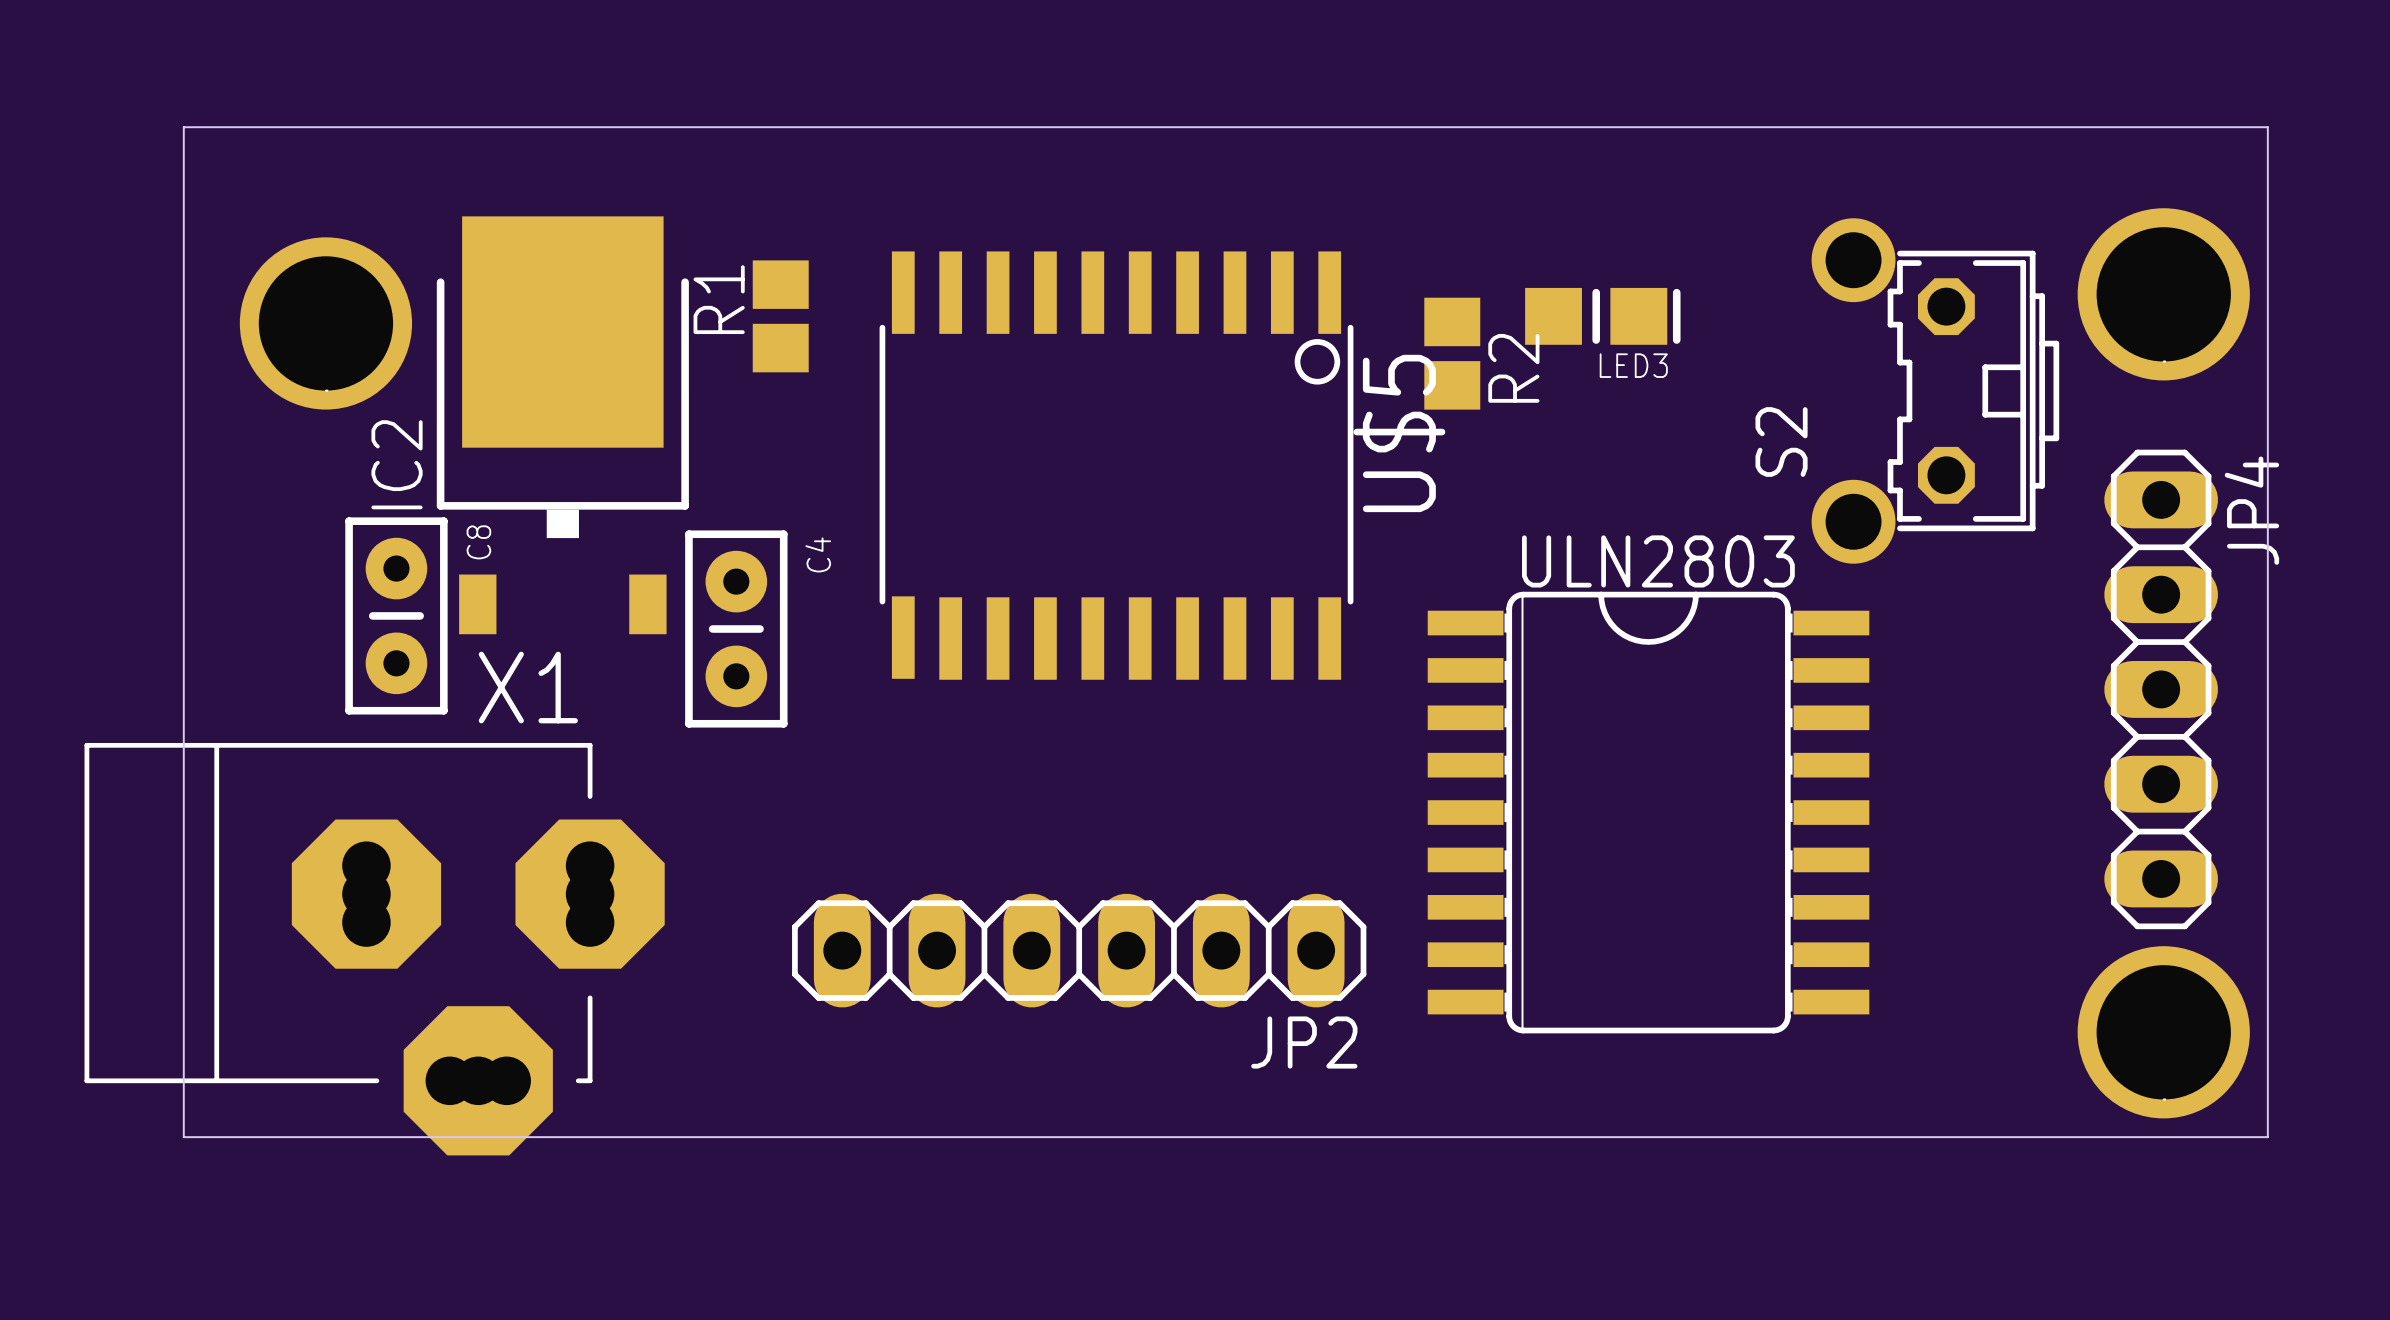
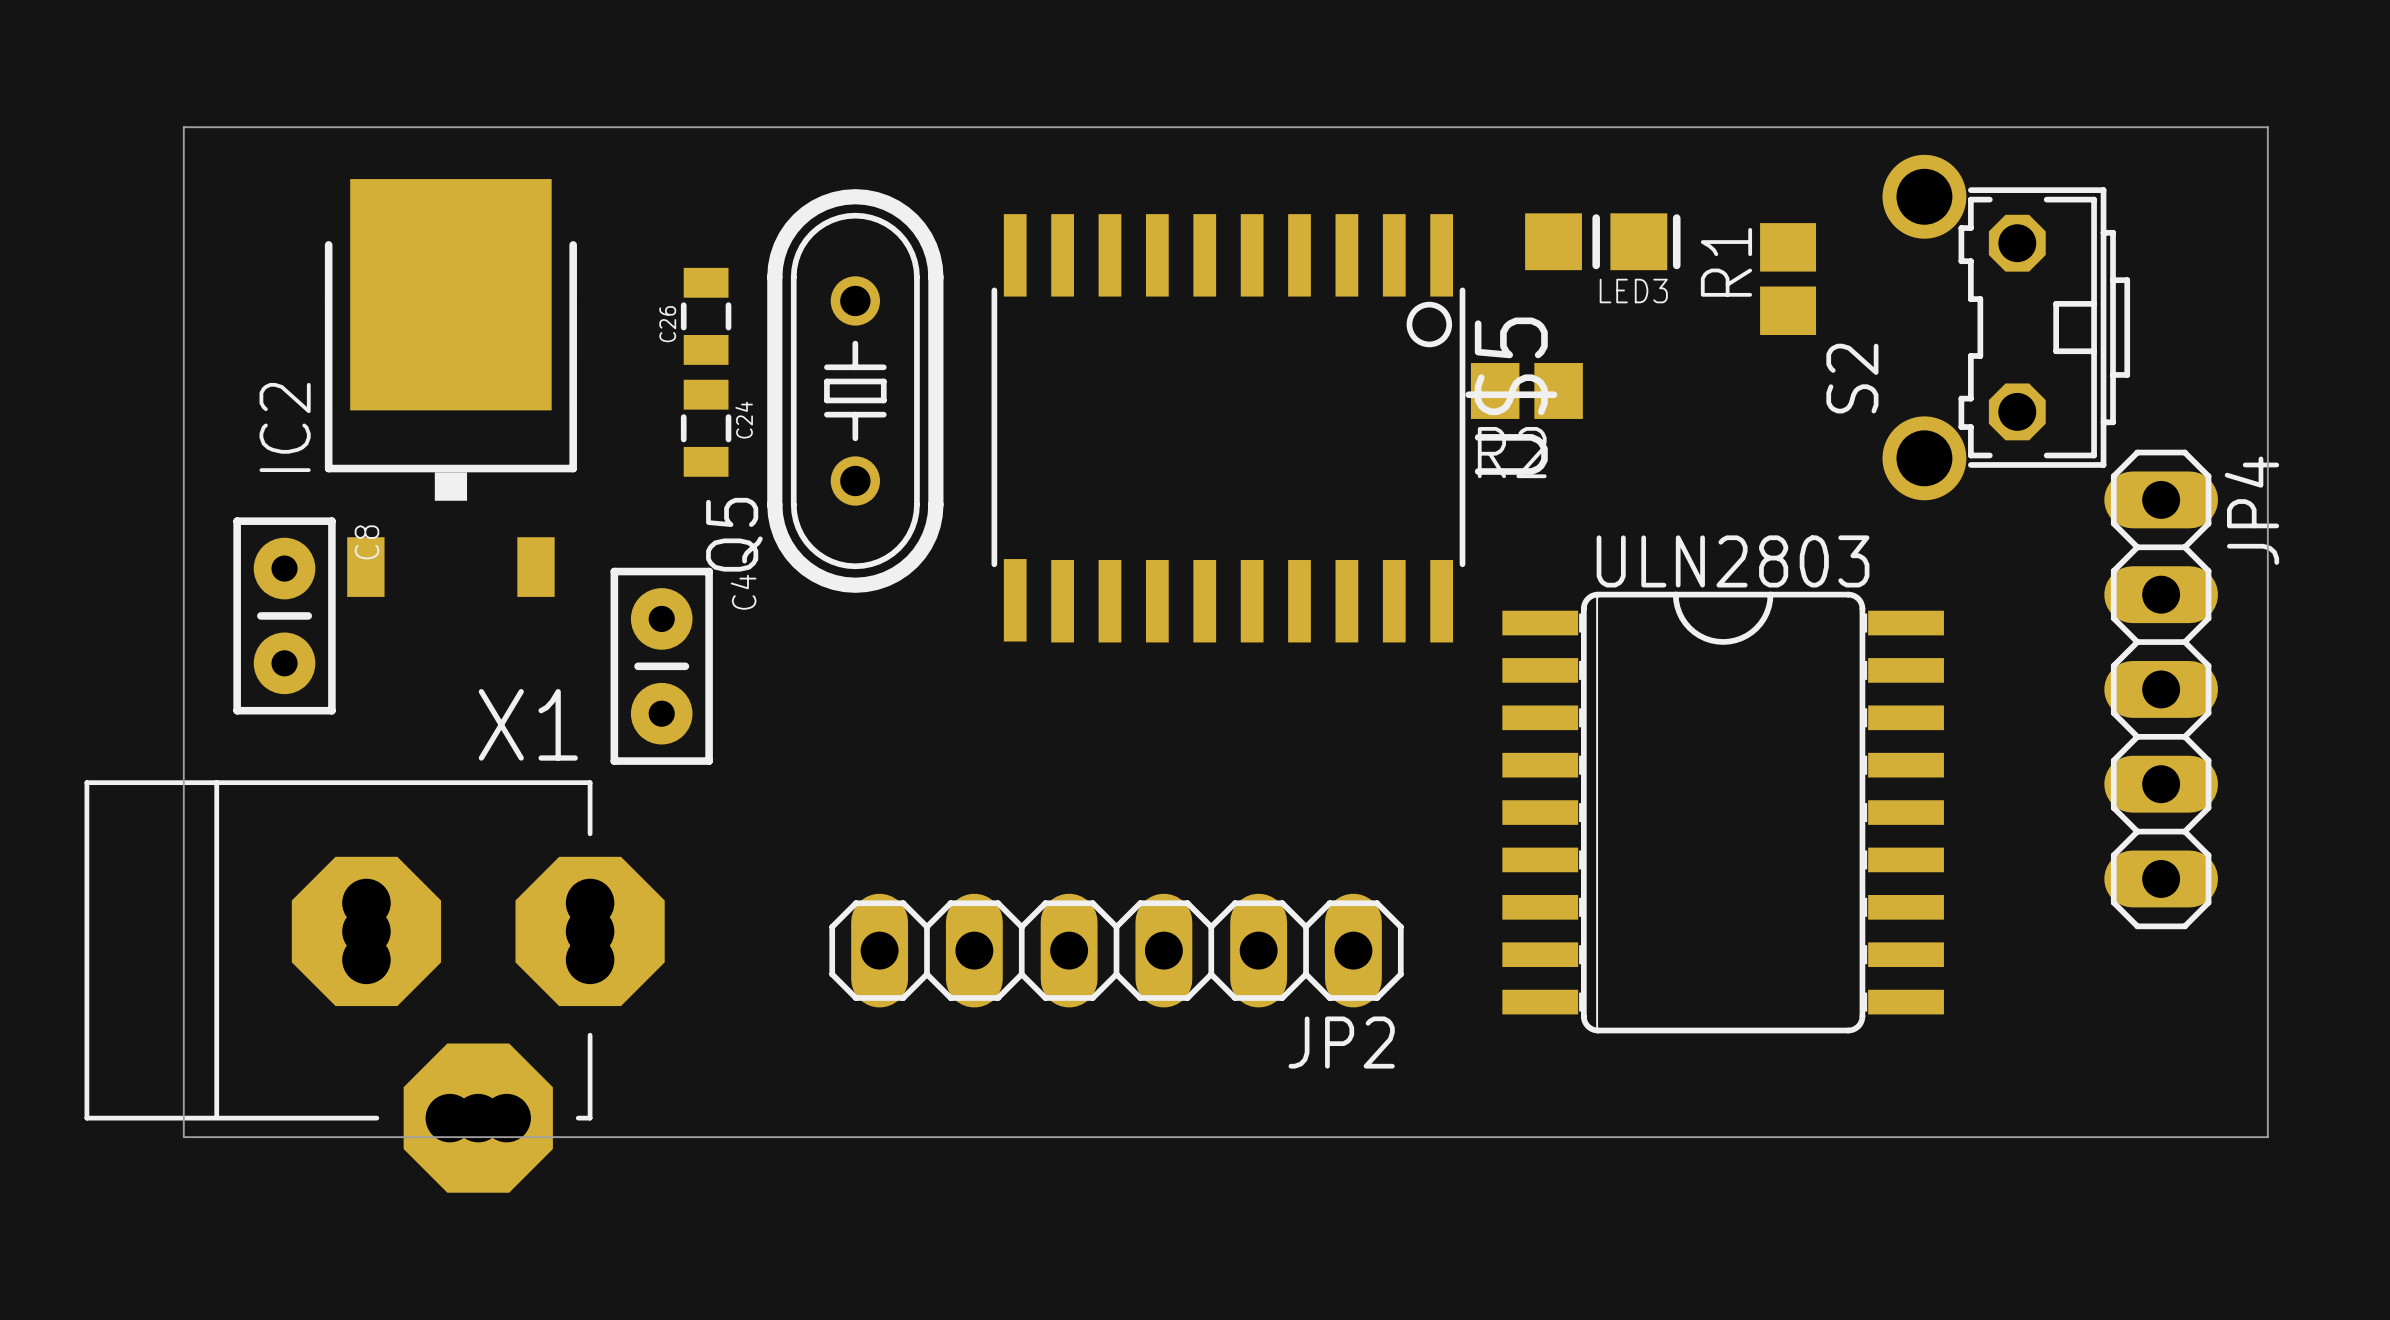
part: (2163, 294) -> none
C26: none -> (706, 316)
R1 position: (780, 316) -> (1788, 279)
LED3 position: (1602, 316) -> (1602, 241)
part: (325, 323) -> none
R2 rotation: 0° (1452, 353) -> 90° clockwise (1526, 390)
R2 position: (1452, 353) -> (1526, 390)
Q5: none -> (855, 390)
S2 position: (1935, 390) -> (2006, 327)
IC2 position: (562, 425) -> (450, 387)
C24: none -> (706, 428)
U$5 position: (1116, 465) -> (1228, 428)
C8 position: (396, 615) -> (284, 615)
C4 position: (736, 629) -> (661, 666)
ULN2803 position: (1648, 812) -> (1723, 812)
X1 position: (374, 949) -> (374, 986)
JP2 position: (1079, 950) -> (1116, 950)
part: (2163, 1032) -> none

